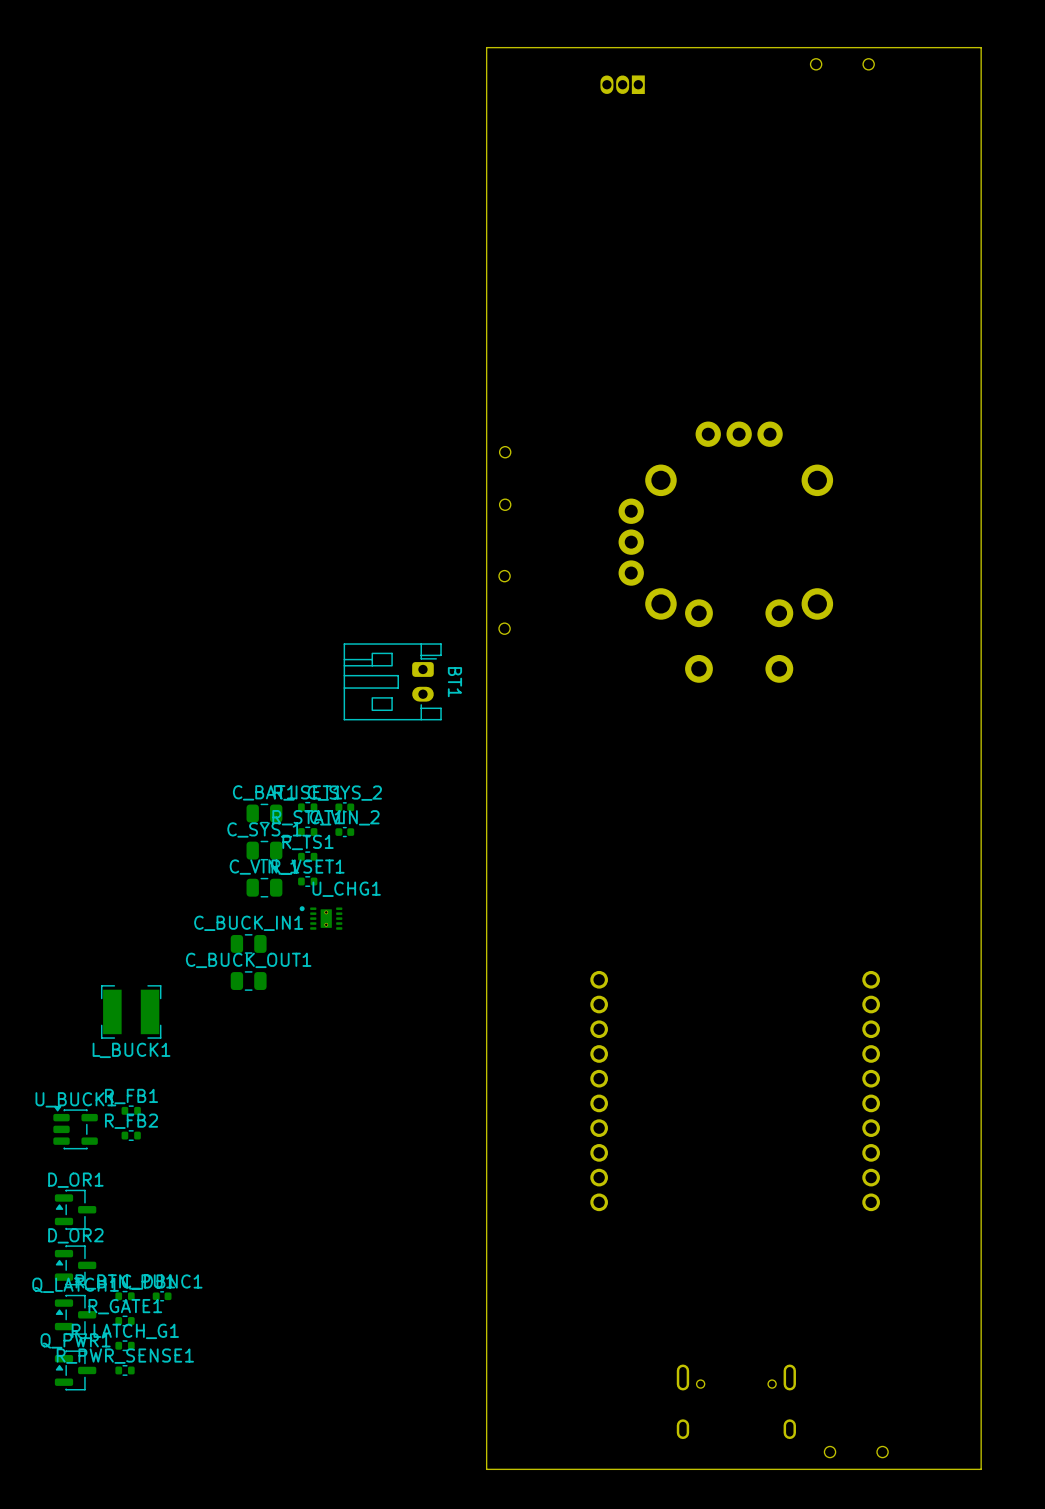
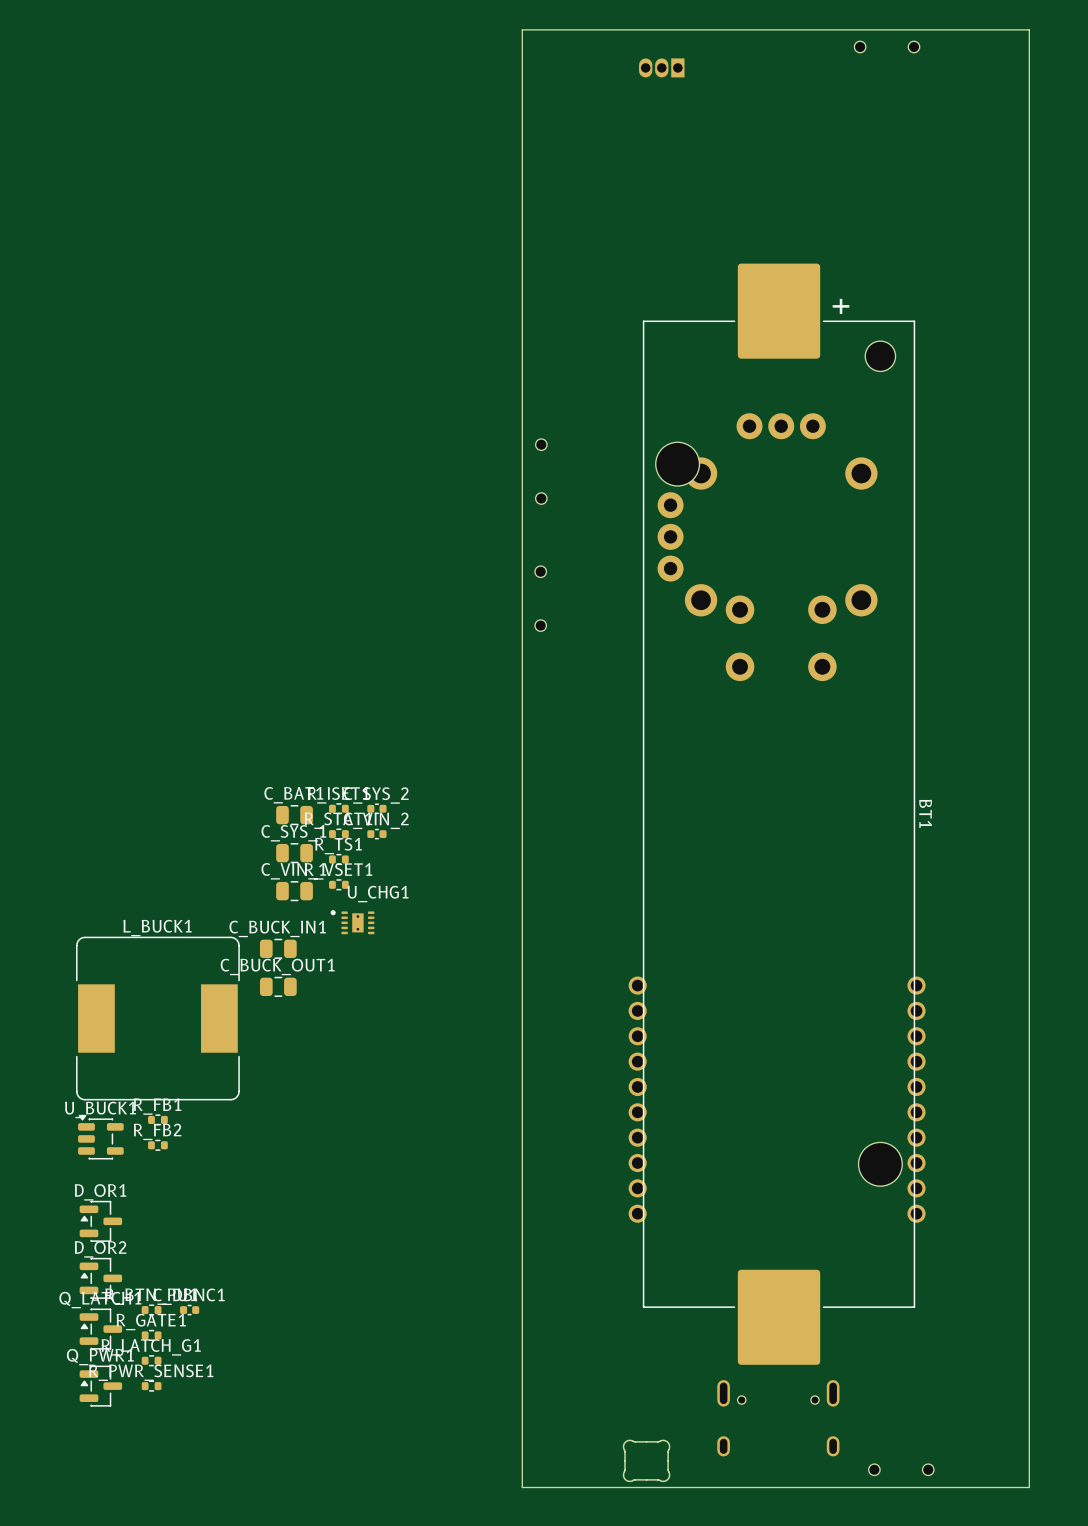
BT1 footprint: [343, 643, 442, 721] -> [642, 263, 916, 1365]
BT1 name position: BT1 (454, 682) -> BT1 (925, 813)
L_BUCK1 footprint: [100, 985, 162, 1039] -> [76, 936, 240, 1101]
L_BUCK1 name position: L_BUCK1 (131, 1050) -> L_BUCK1 (157, 928)
part: none -> (646, 1460)

